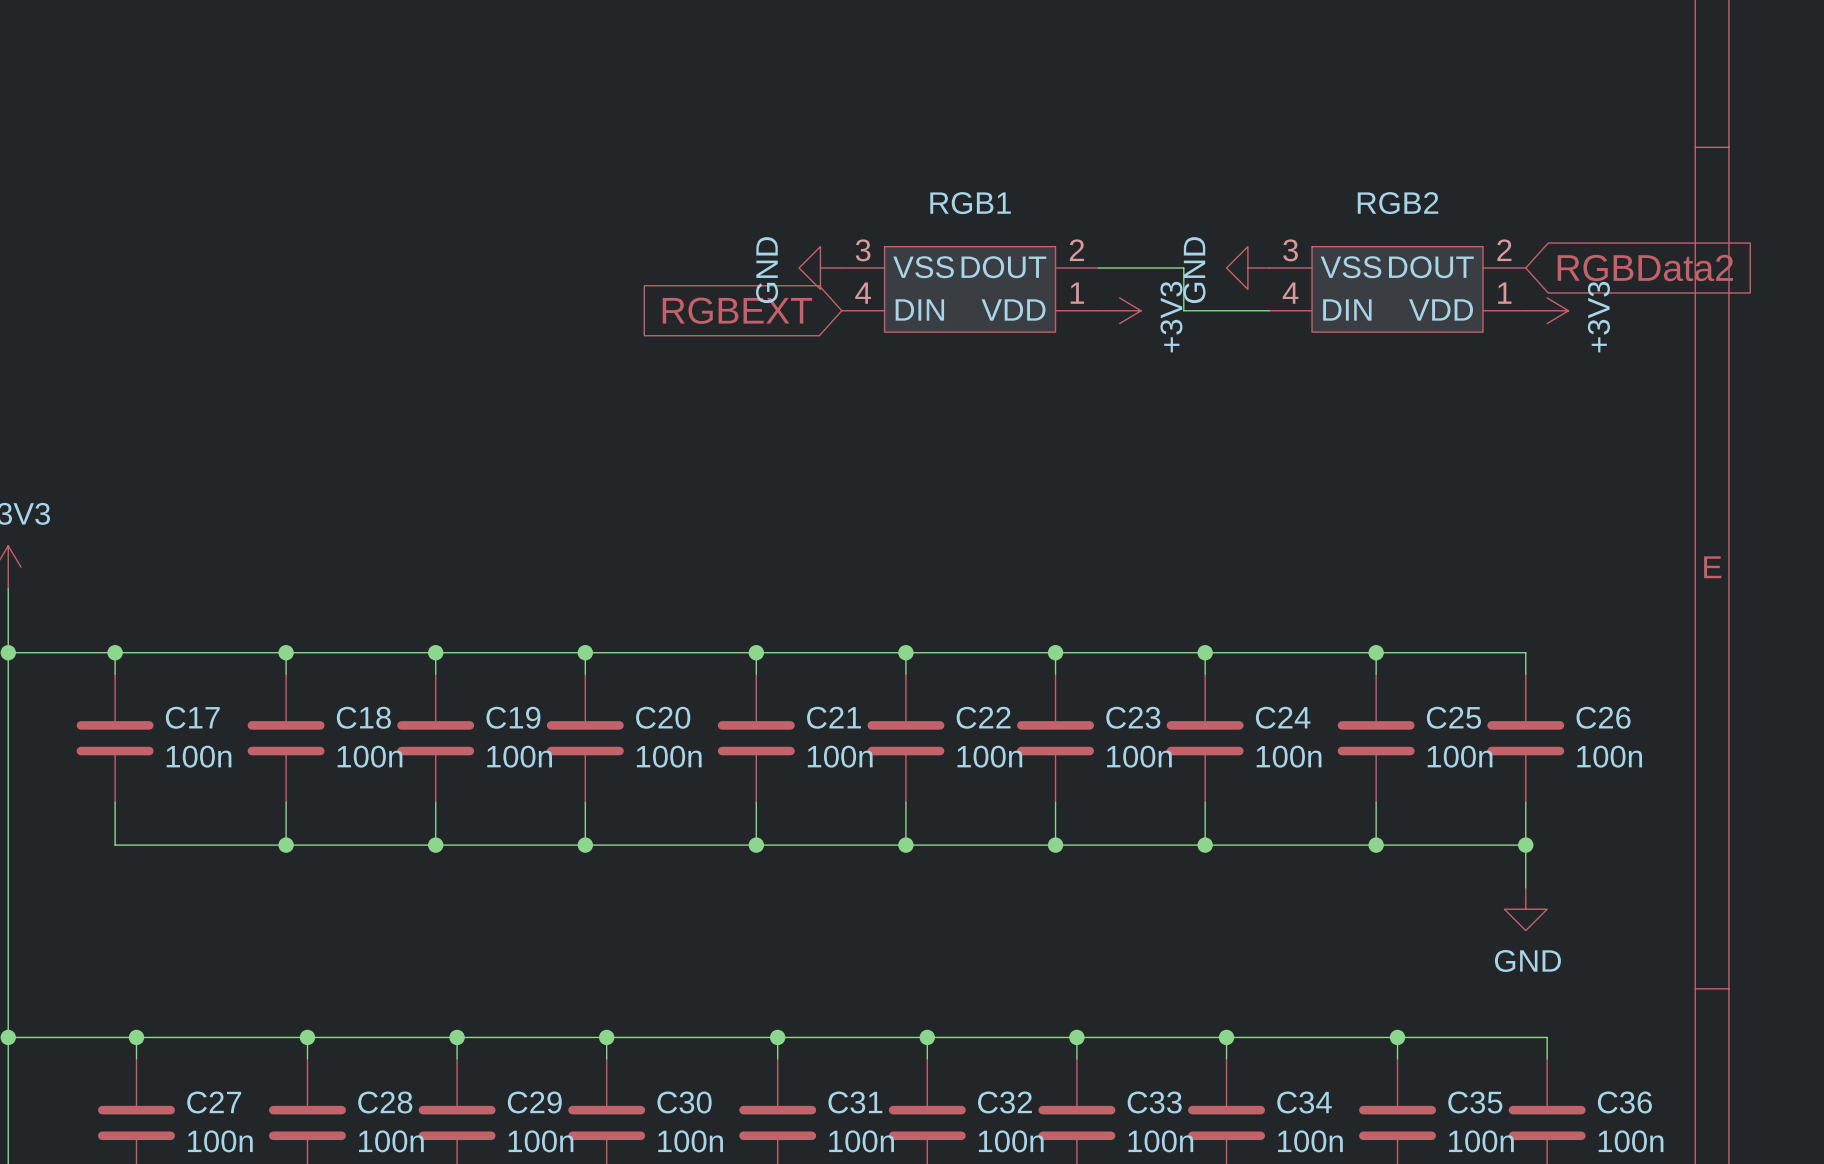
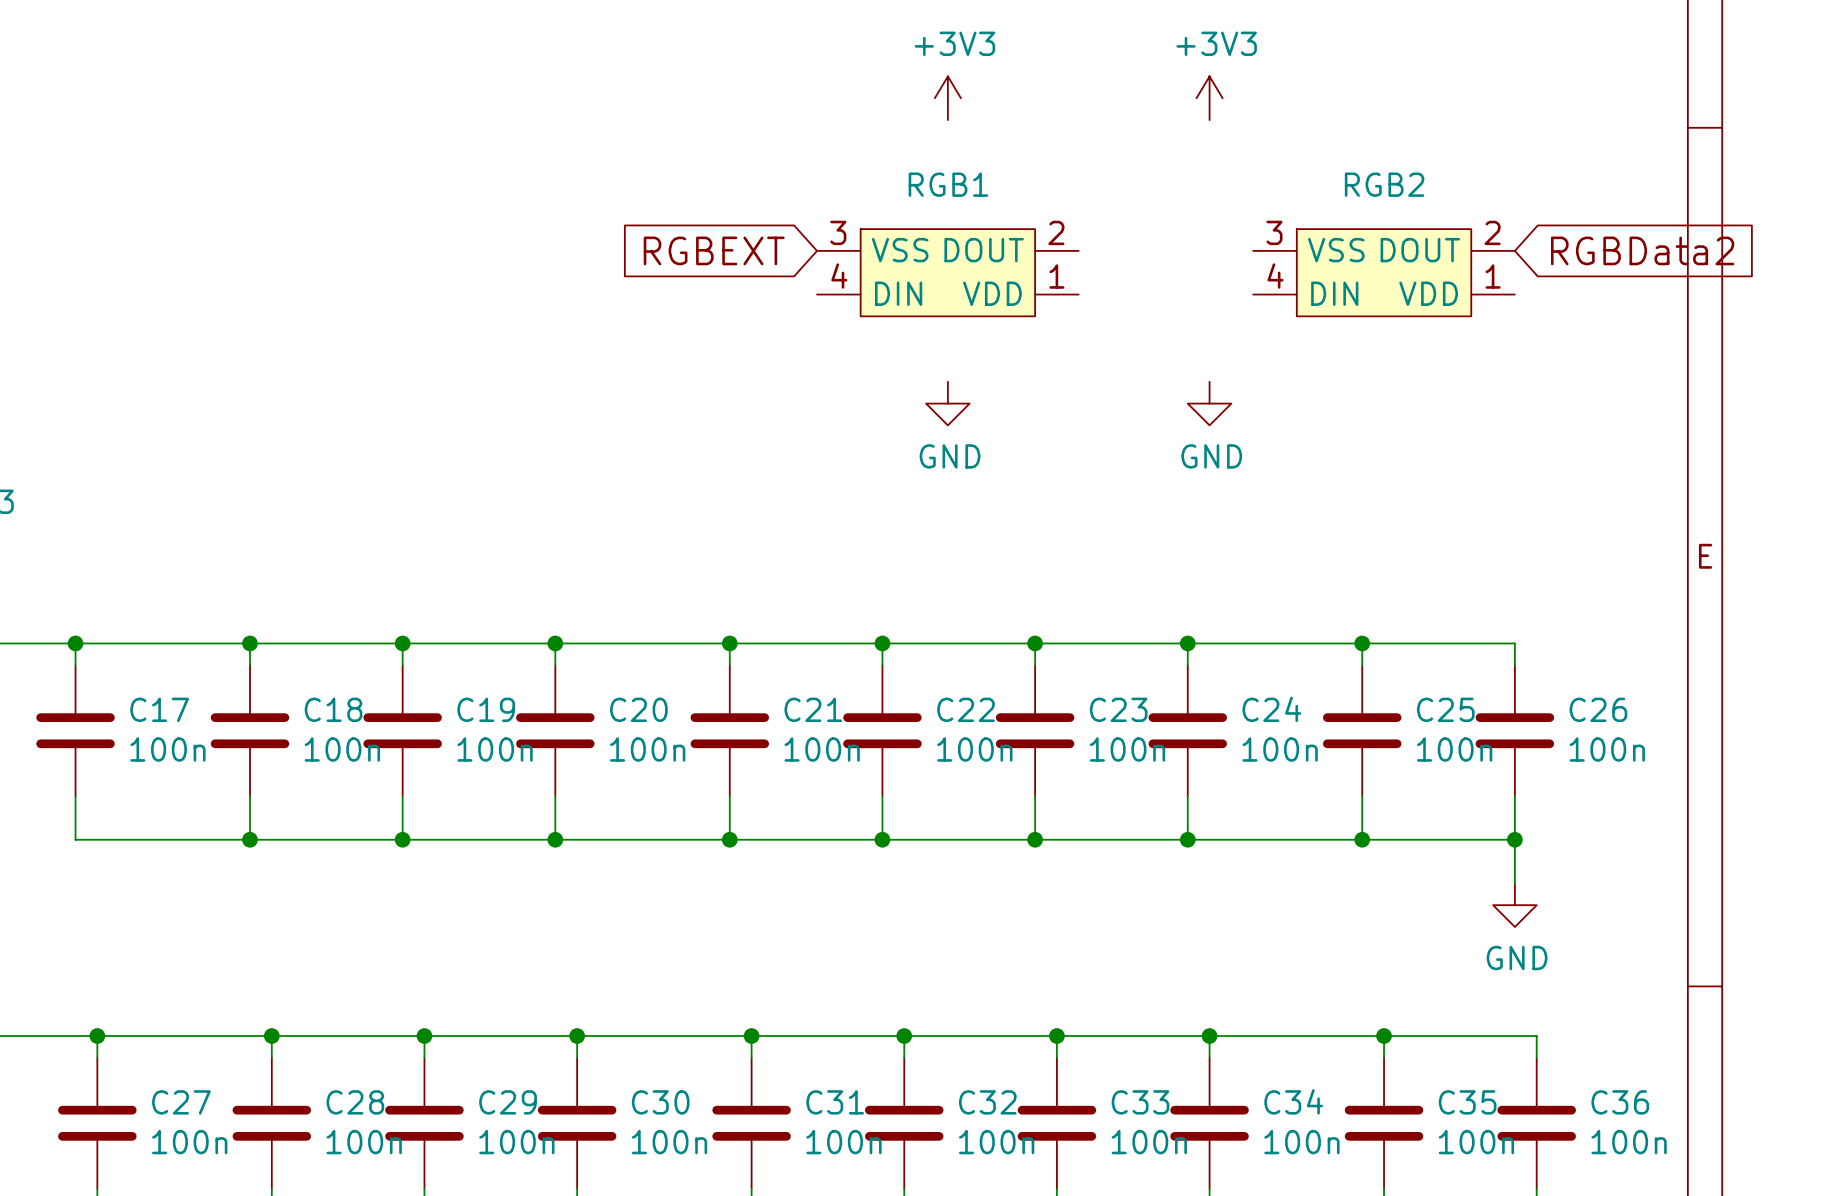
power symbol: none -> +3V3 (947, 98)
power symbol: none -> +3V3 (1209, 98)
power symbol: GND (820, 268) -> none
wire: (1098, 268) (1183, 268) (1183, 310) (1269, 310) -> none
power symbol rotation: 0° (1247, 268) -> 90° counterclockwise (1209, 403)
power symbol position: GND (1247, 268) -> GND (1209, 403)
global label position: RGBEXT (737, 310) -> RGBEXT (714, 250)
power symbol: +3V3 (1119, 310) -> none
power symbol: +3V3 (1547, 310) -> none
power symbol: none -> GND (947, 403)

